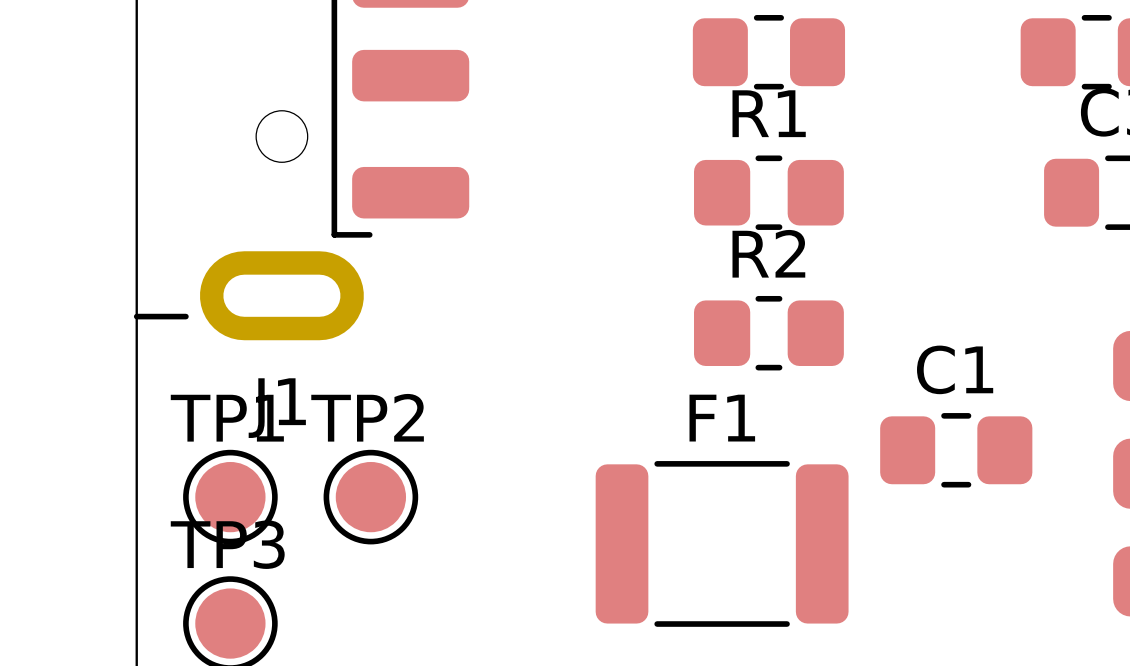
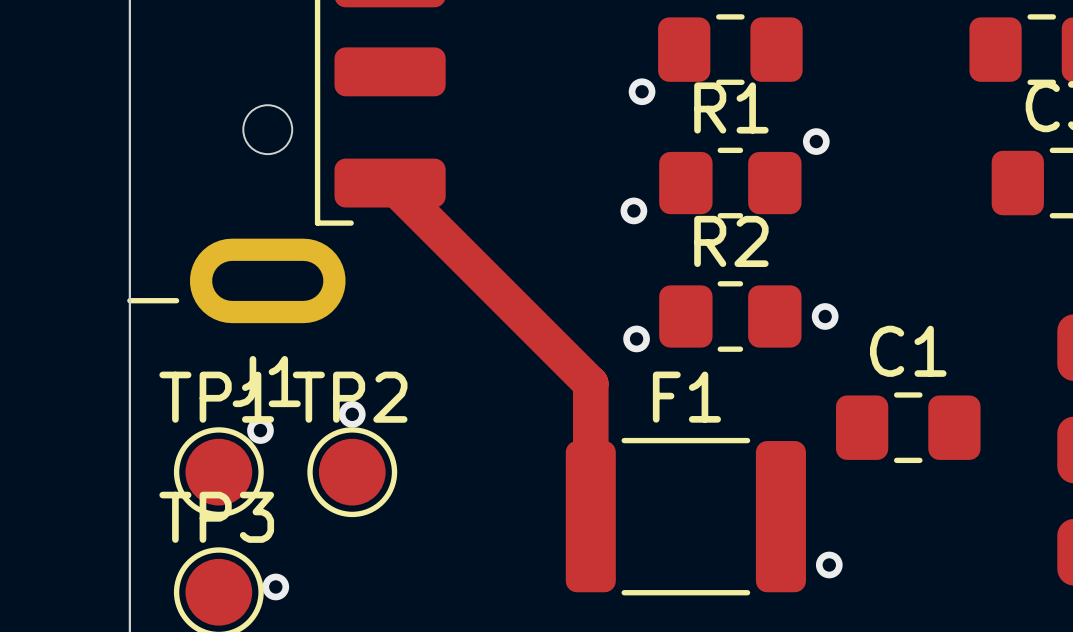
via: none -> (642, 91)
via: none -> (816, 141)
track: none -> (390, 183) (590, 383) (590, 516)
via: none -> (633, 210)
via: none -> (825, 316)
via: none -> (636, 338)
via: none -> (352, 414)
via: none -> (260, 430)
via: none -> (829, 564)
via: none -> (275, 586)

